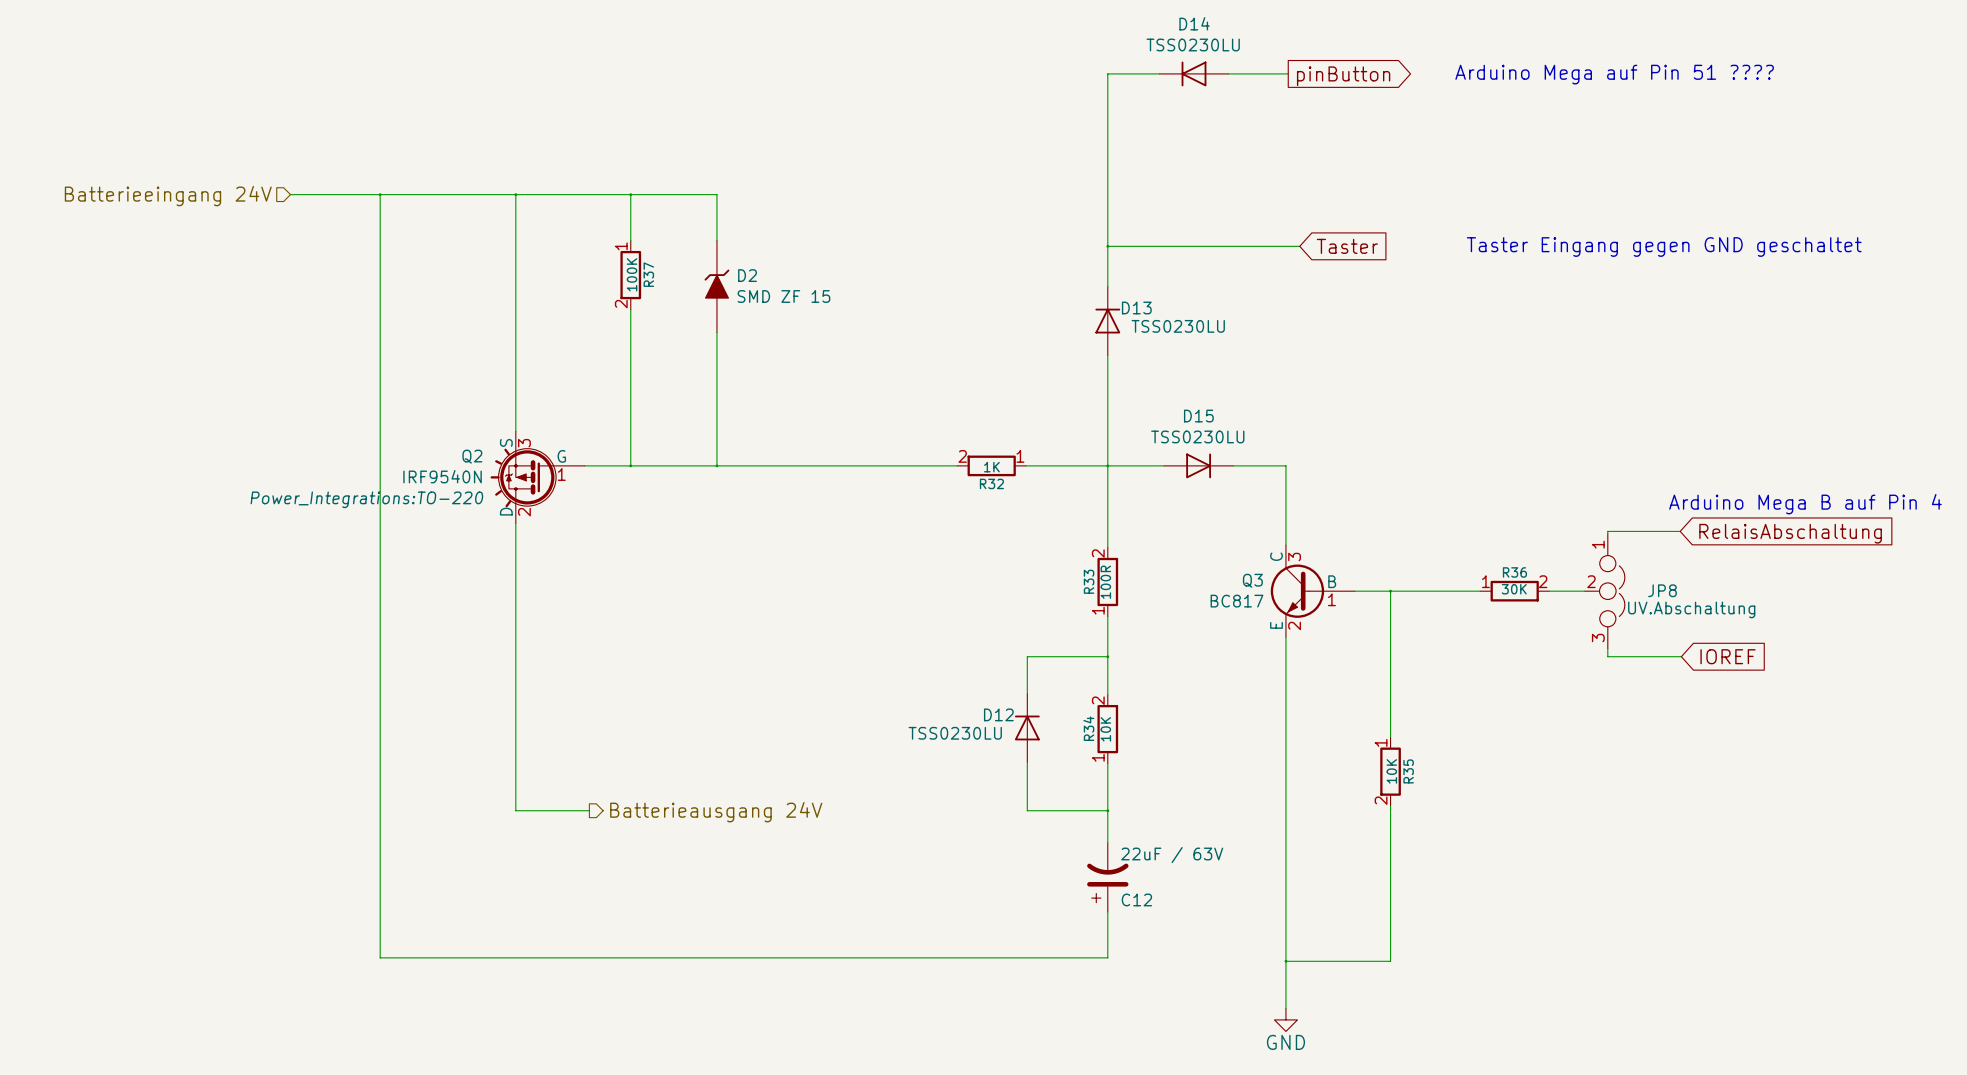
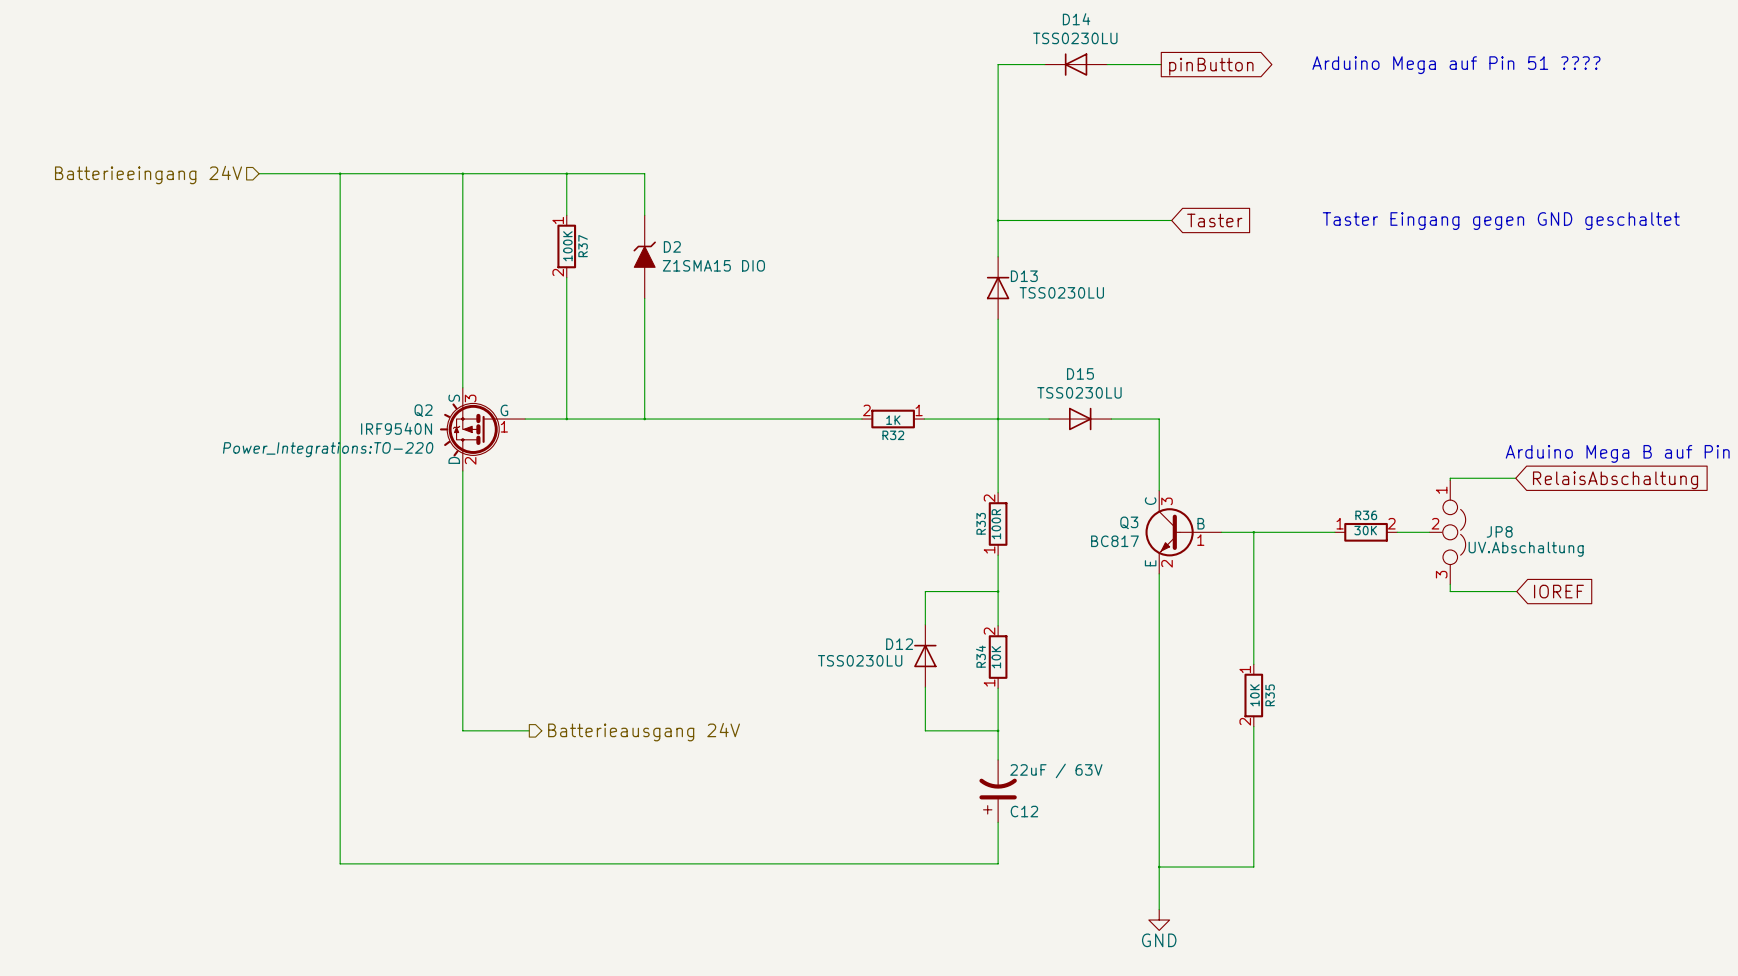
D2 value: SMD ZF 15 (783, 296) -> Z1SMA15 DIO (713, 265)

